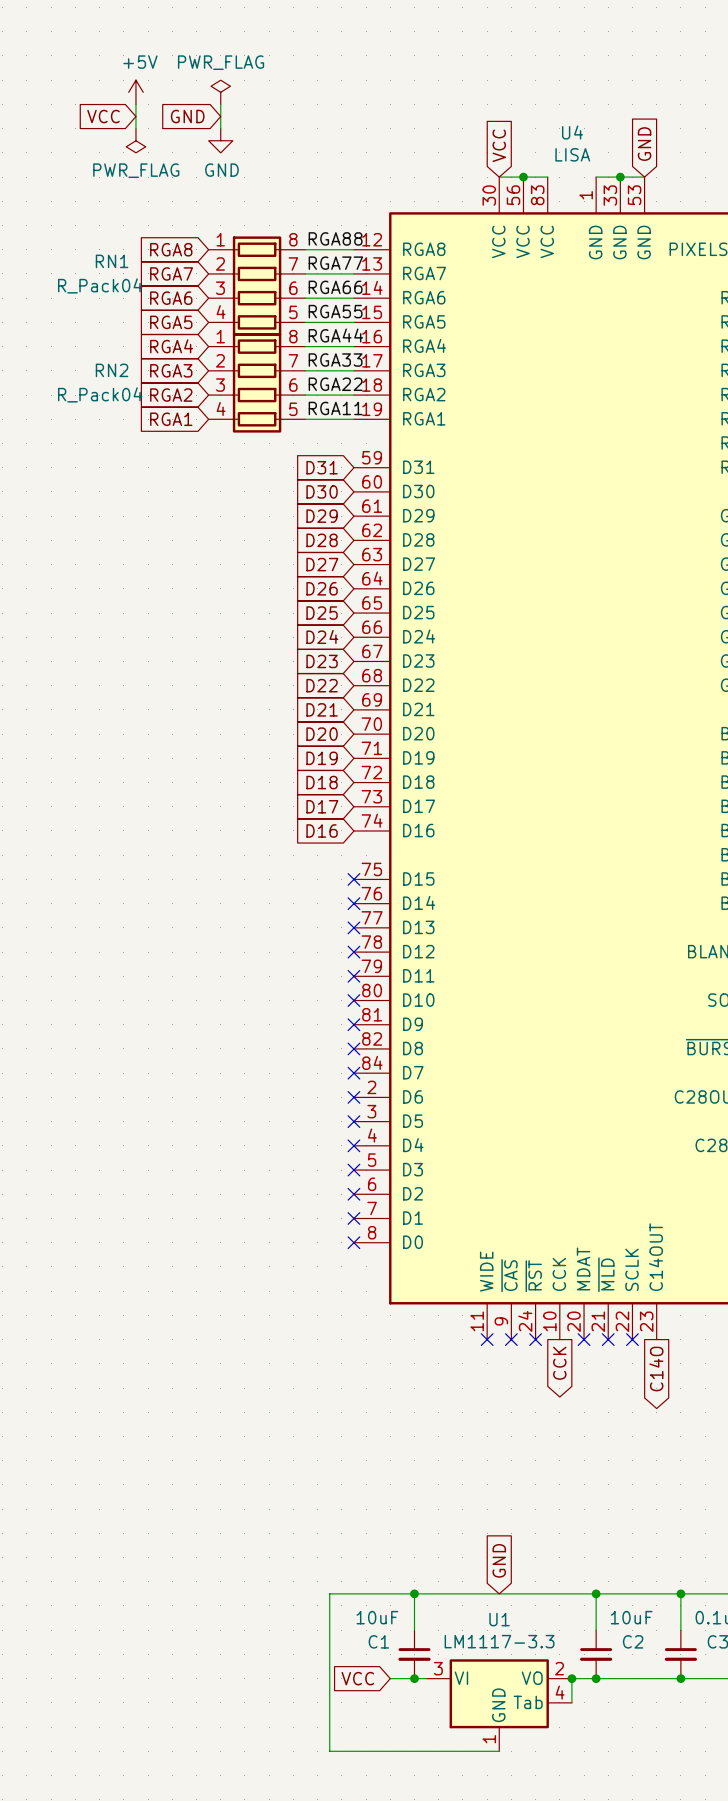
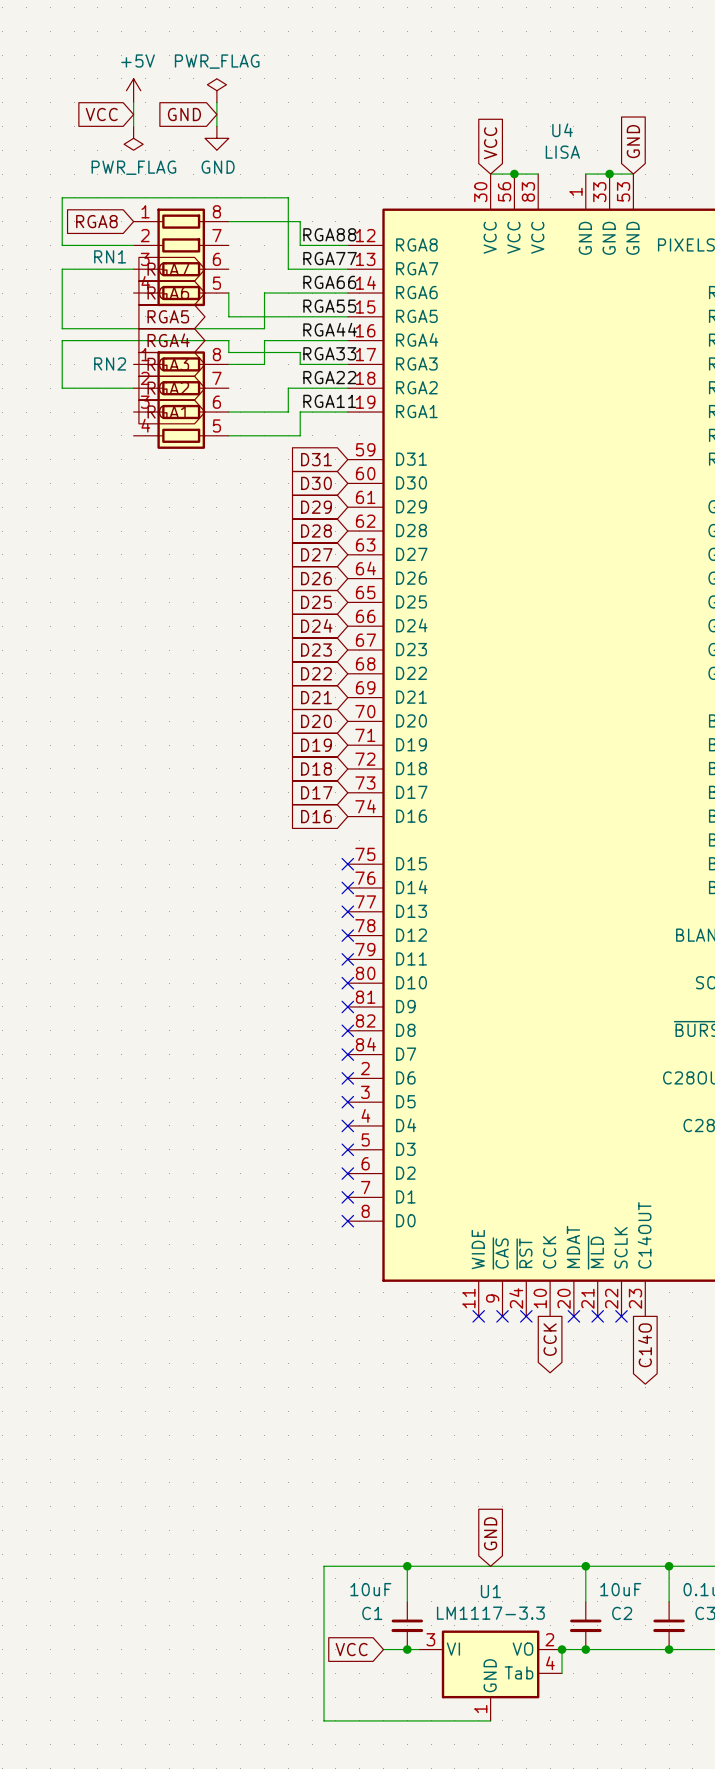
wire: none -> (228, 221) (300, 221) (300, 245)
wire: none -> (133, 245) (62, 245) (62, 197) (288, 197) (288, 269) (300, 269)
global label position: RGA8 (171, 249) -> RGA8 (96, 221)
wire: none -> (133, 269) (62, 269) (62, 328) (264, 328) (264, 293) (300, 293)
RN1 value: R_Pack04 (100, 285) -> none
RN1 position: (257, 286) -> (181, 257)
wire: none -> (300, 364) (300, 352) (228, 352) (228, 340) (62, 340) (62, 388) (133, 388)
RN2 position: (257, 382) -> (181, 400)
RN2 value: R_Pack04 (100, 394) -> none
wire: none -> (300, 412) (300, 435) (228, 435)

